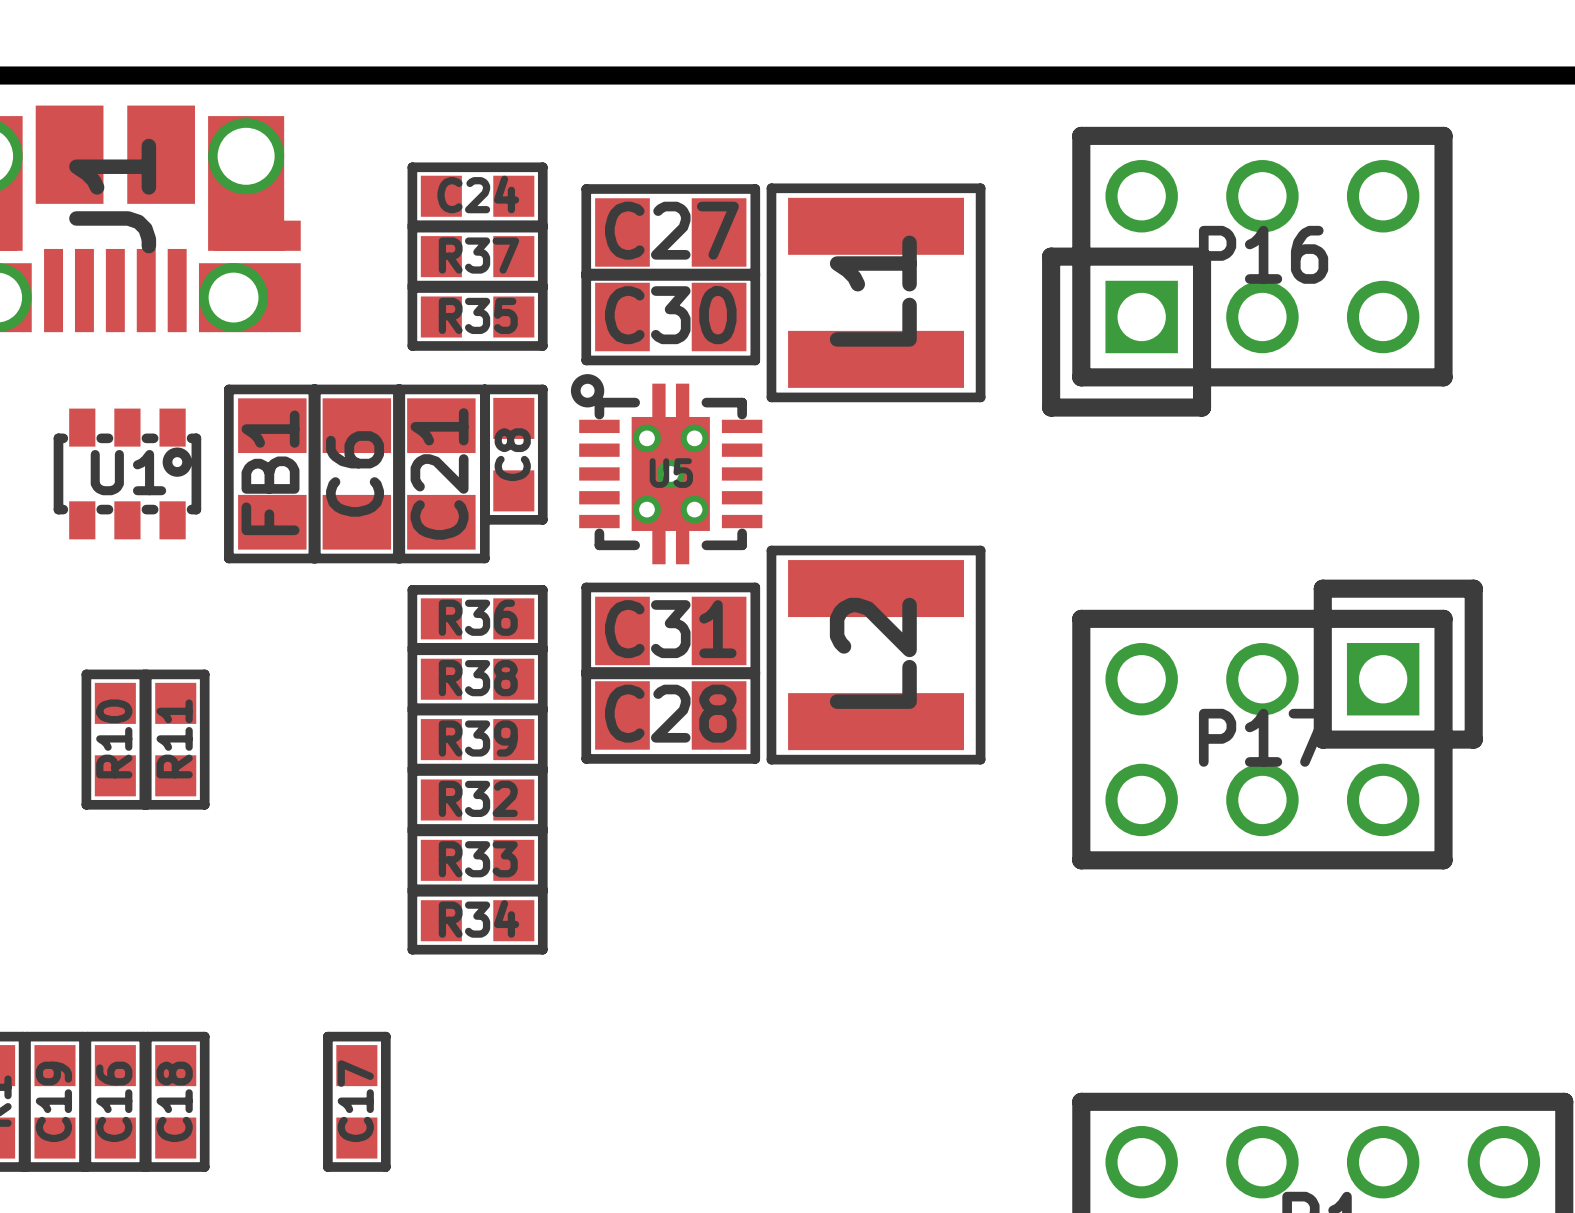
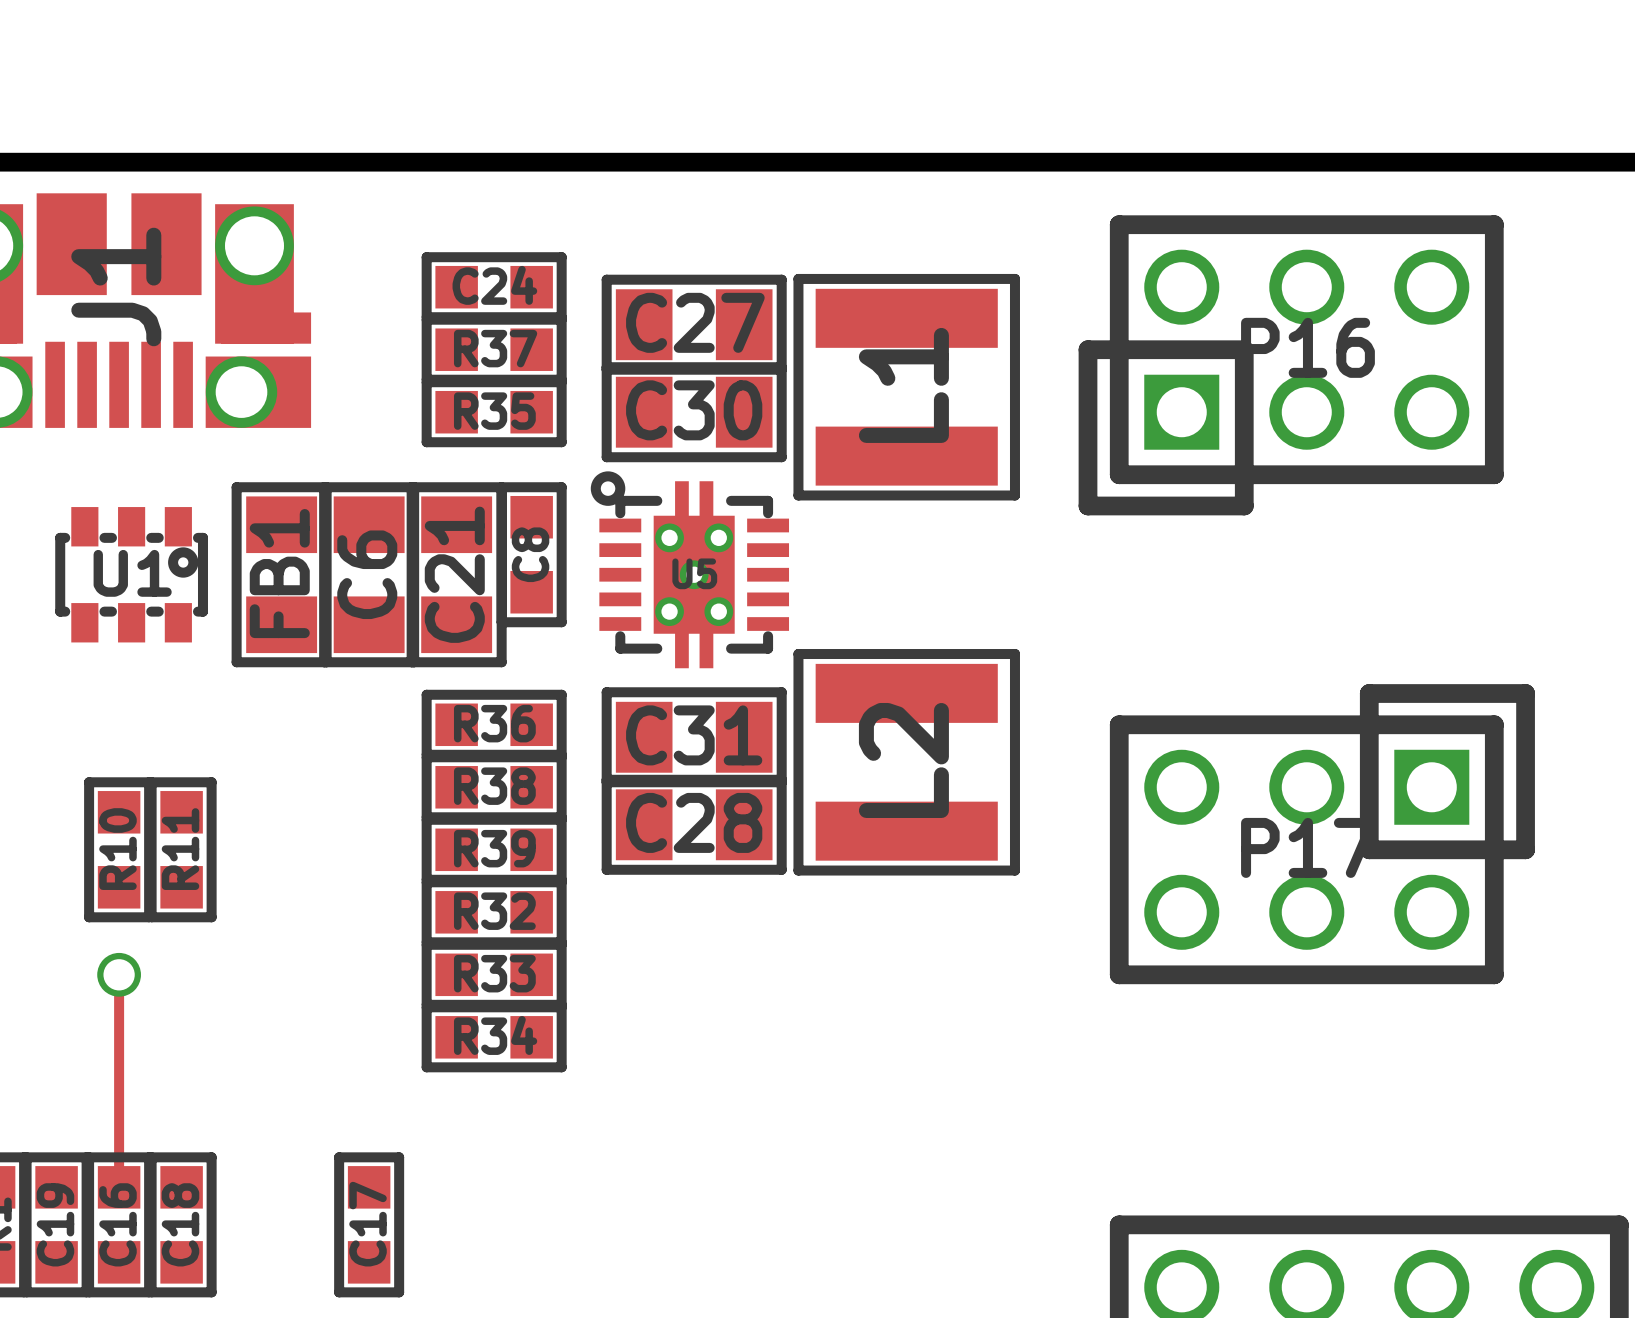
track: none -> (119, 974) (119, 1187)
via: none -> (119, 974)

